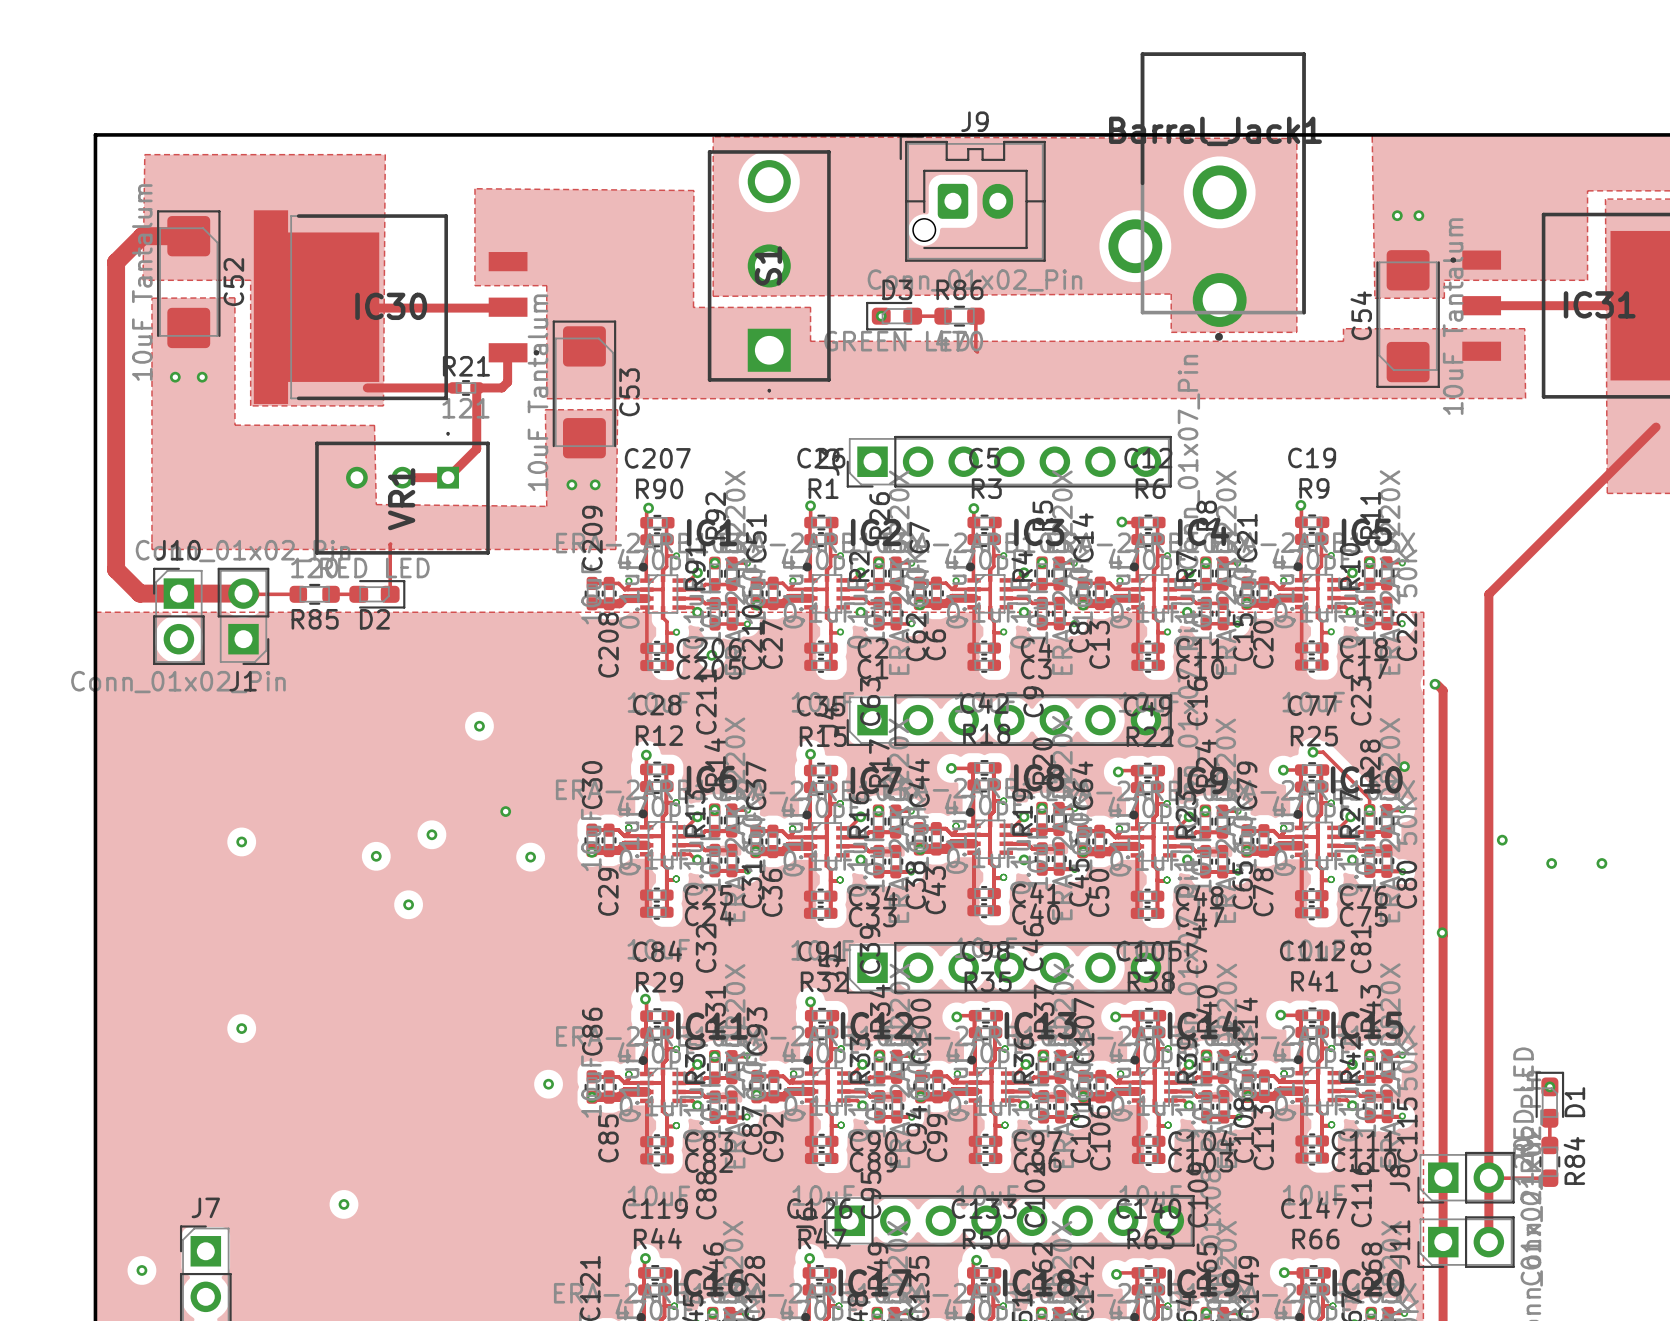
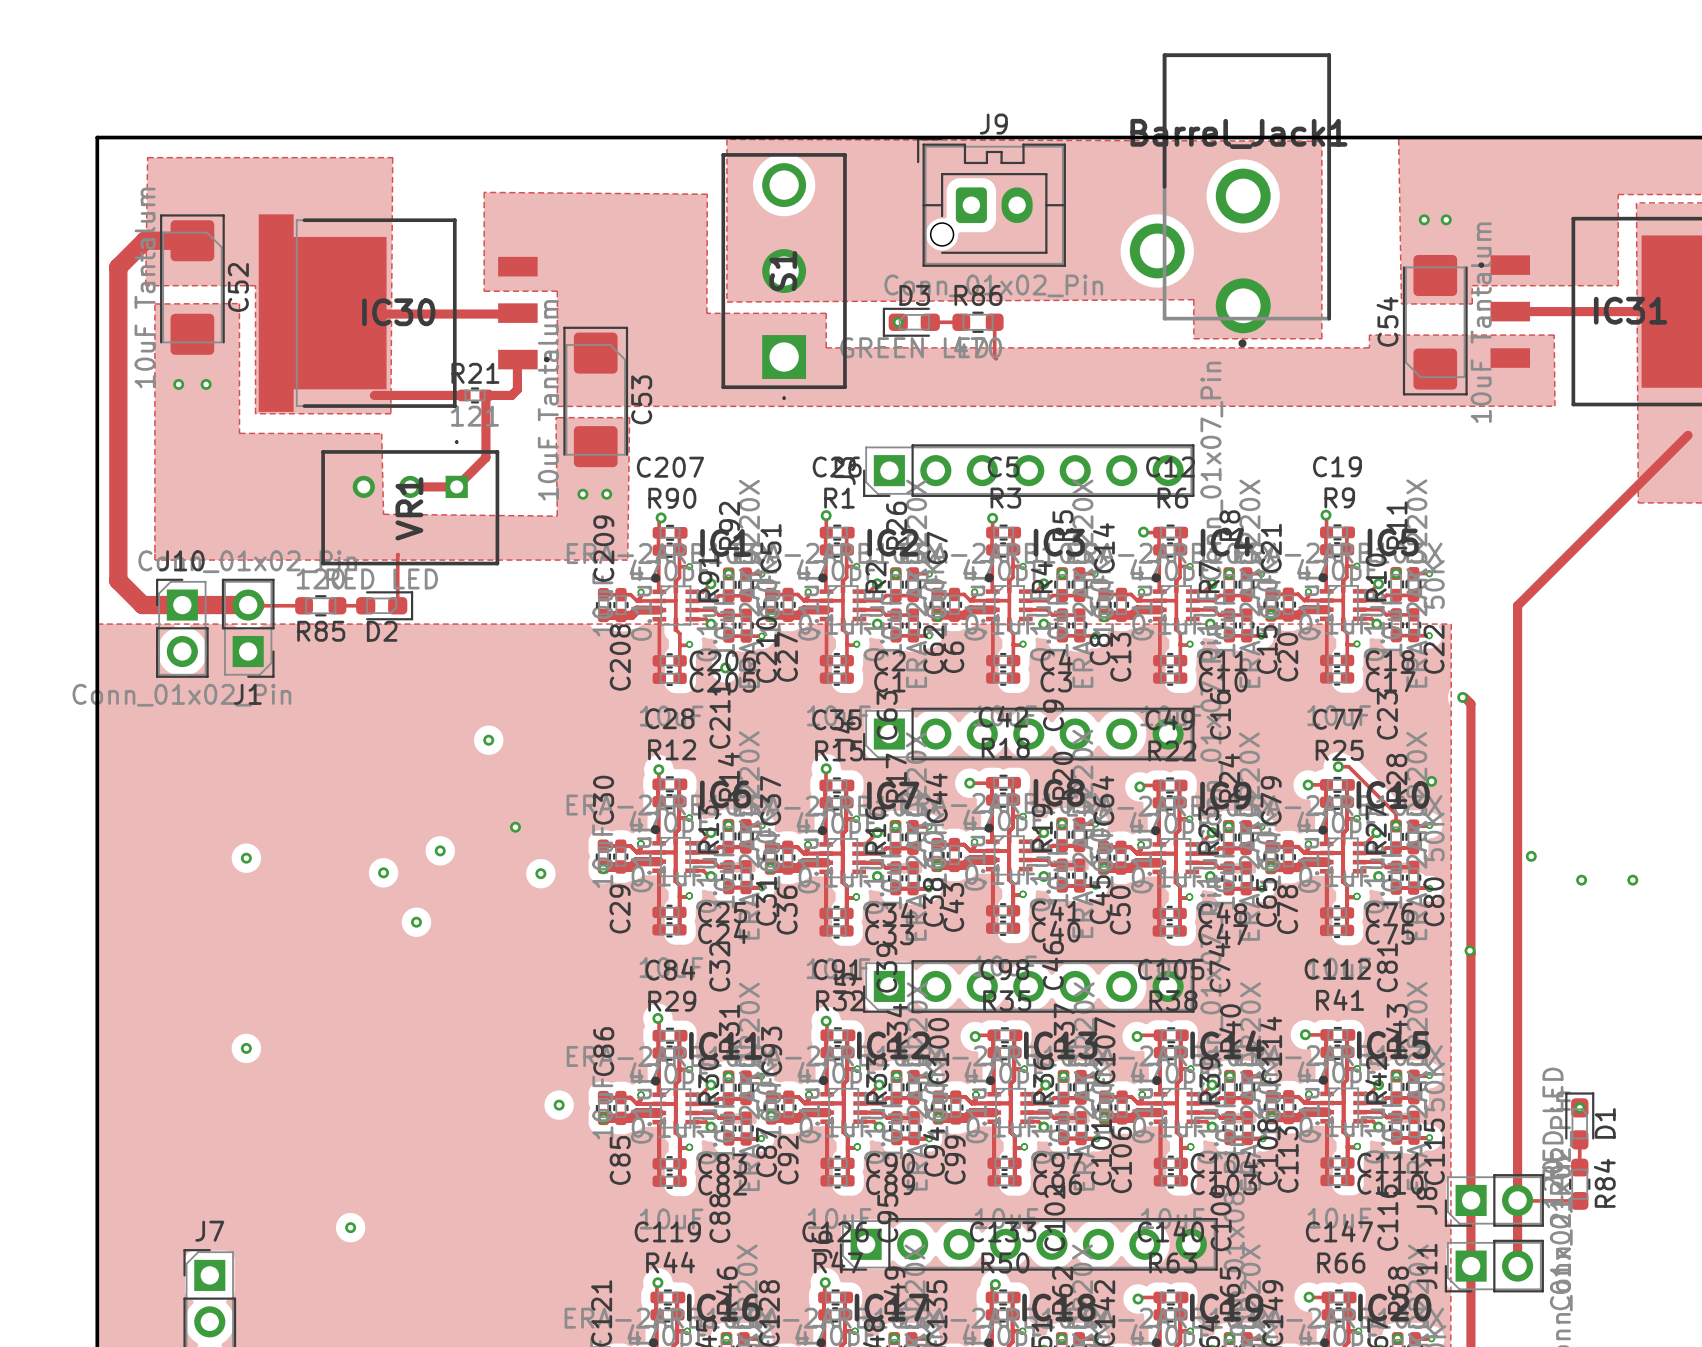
via: (141, 1270) -> none

